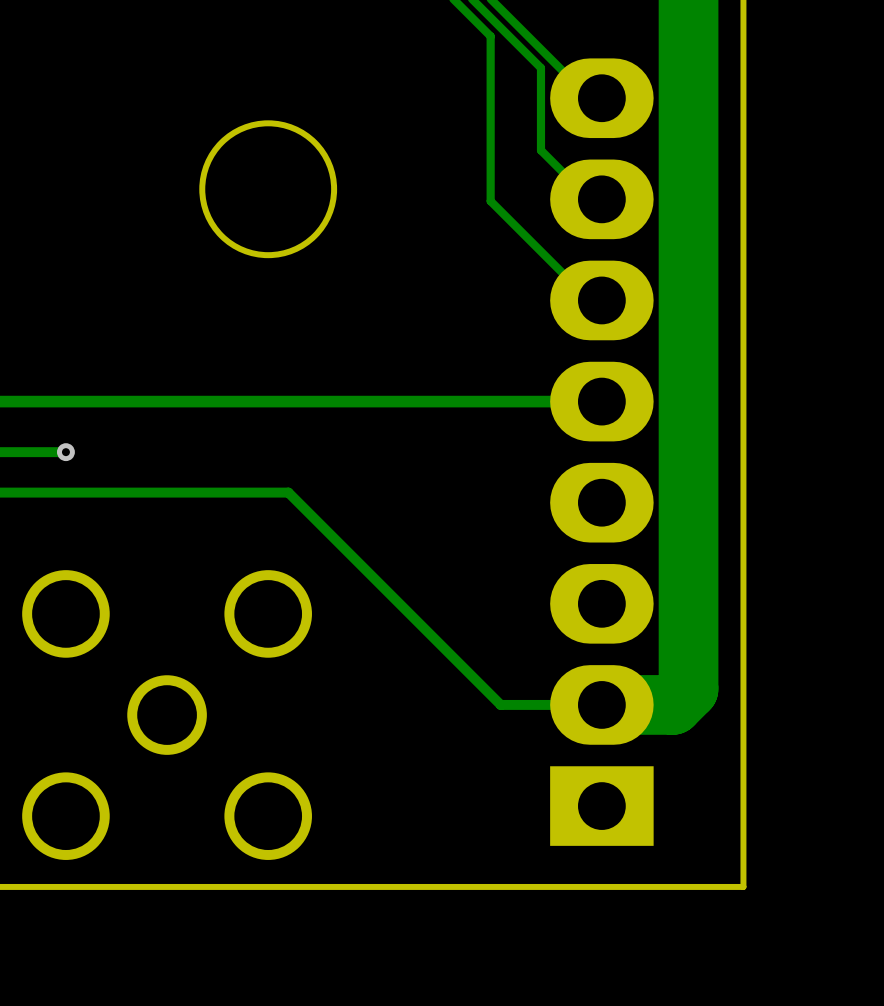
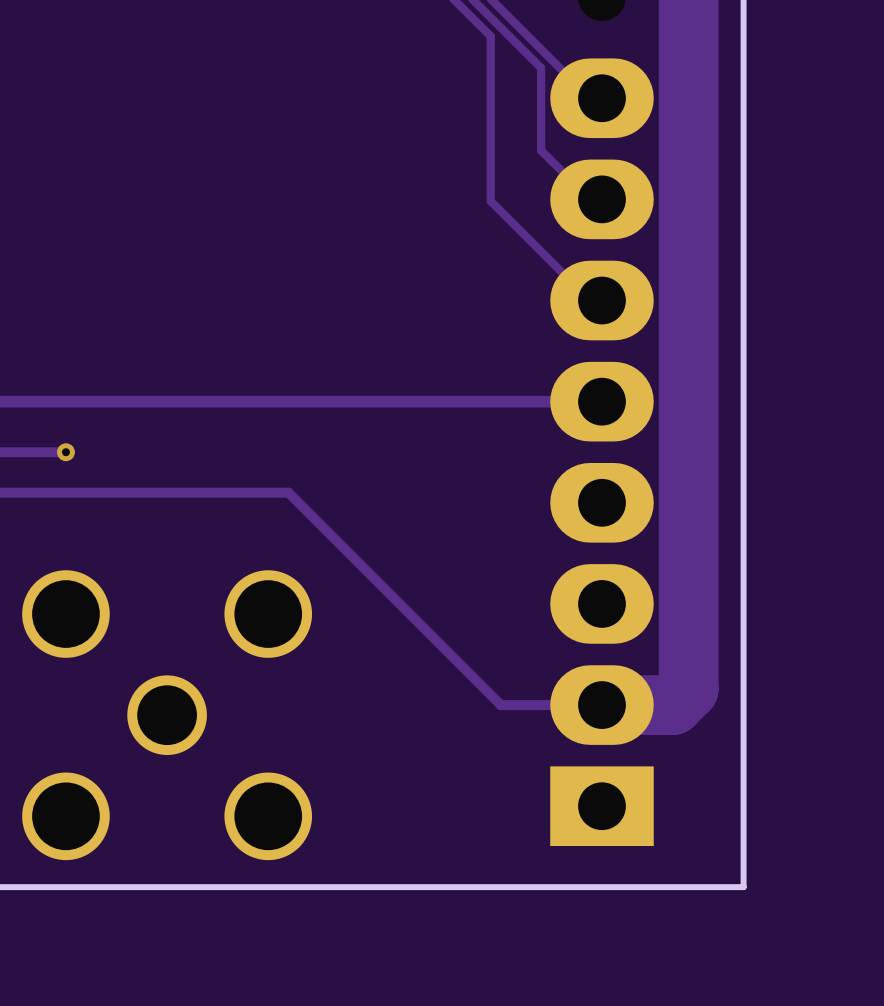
round board edge: [199, 120, 338, 259] -> none

